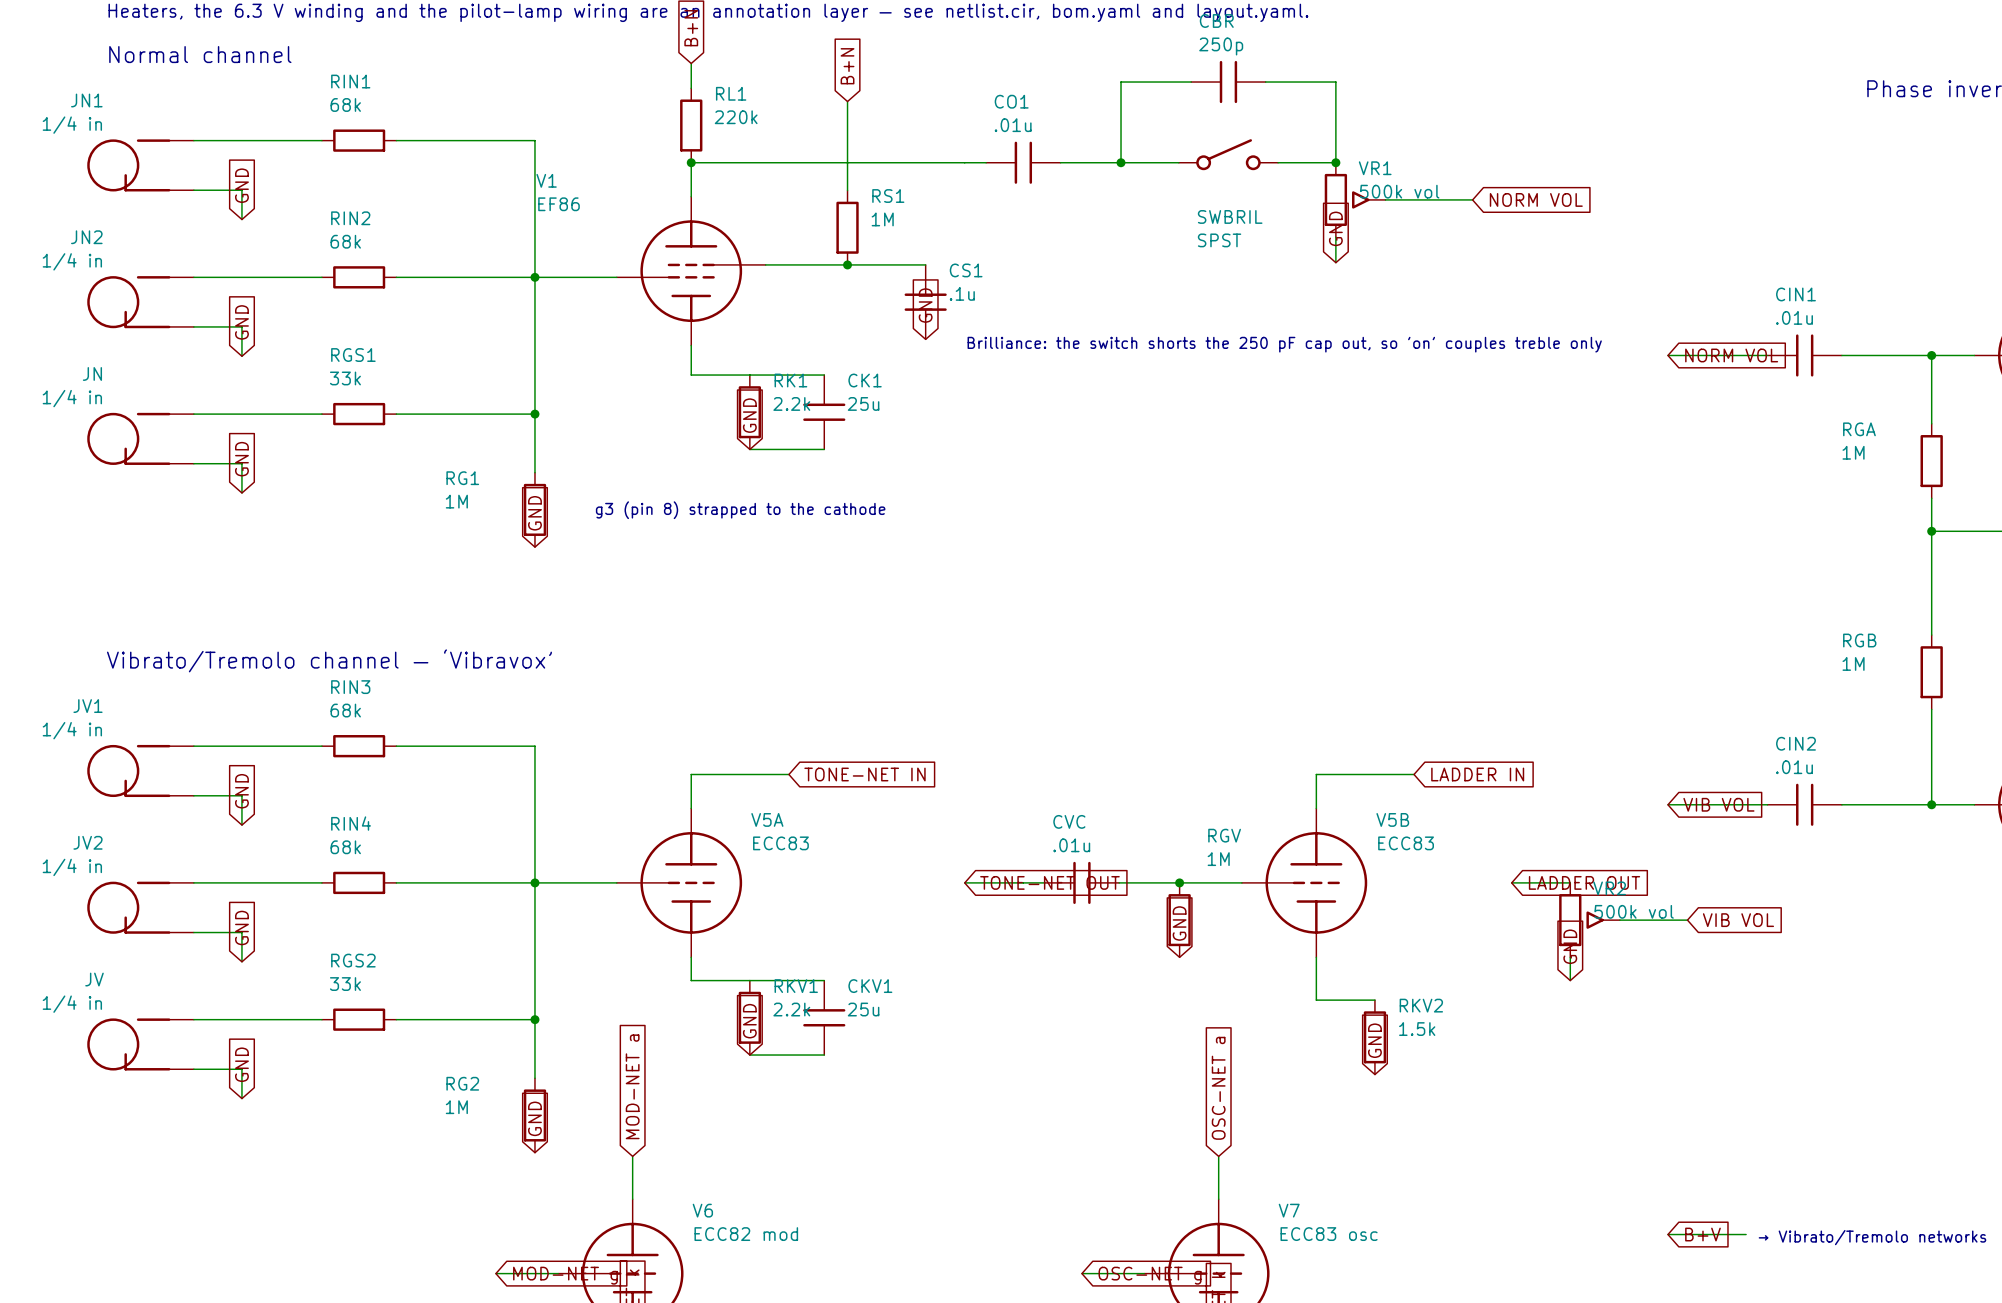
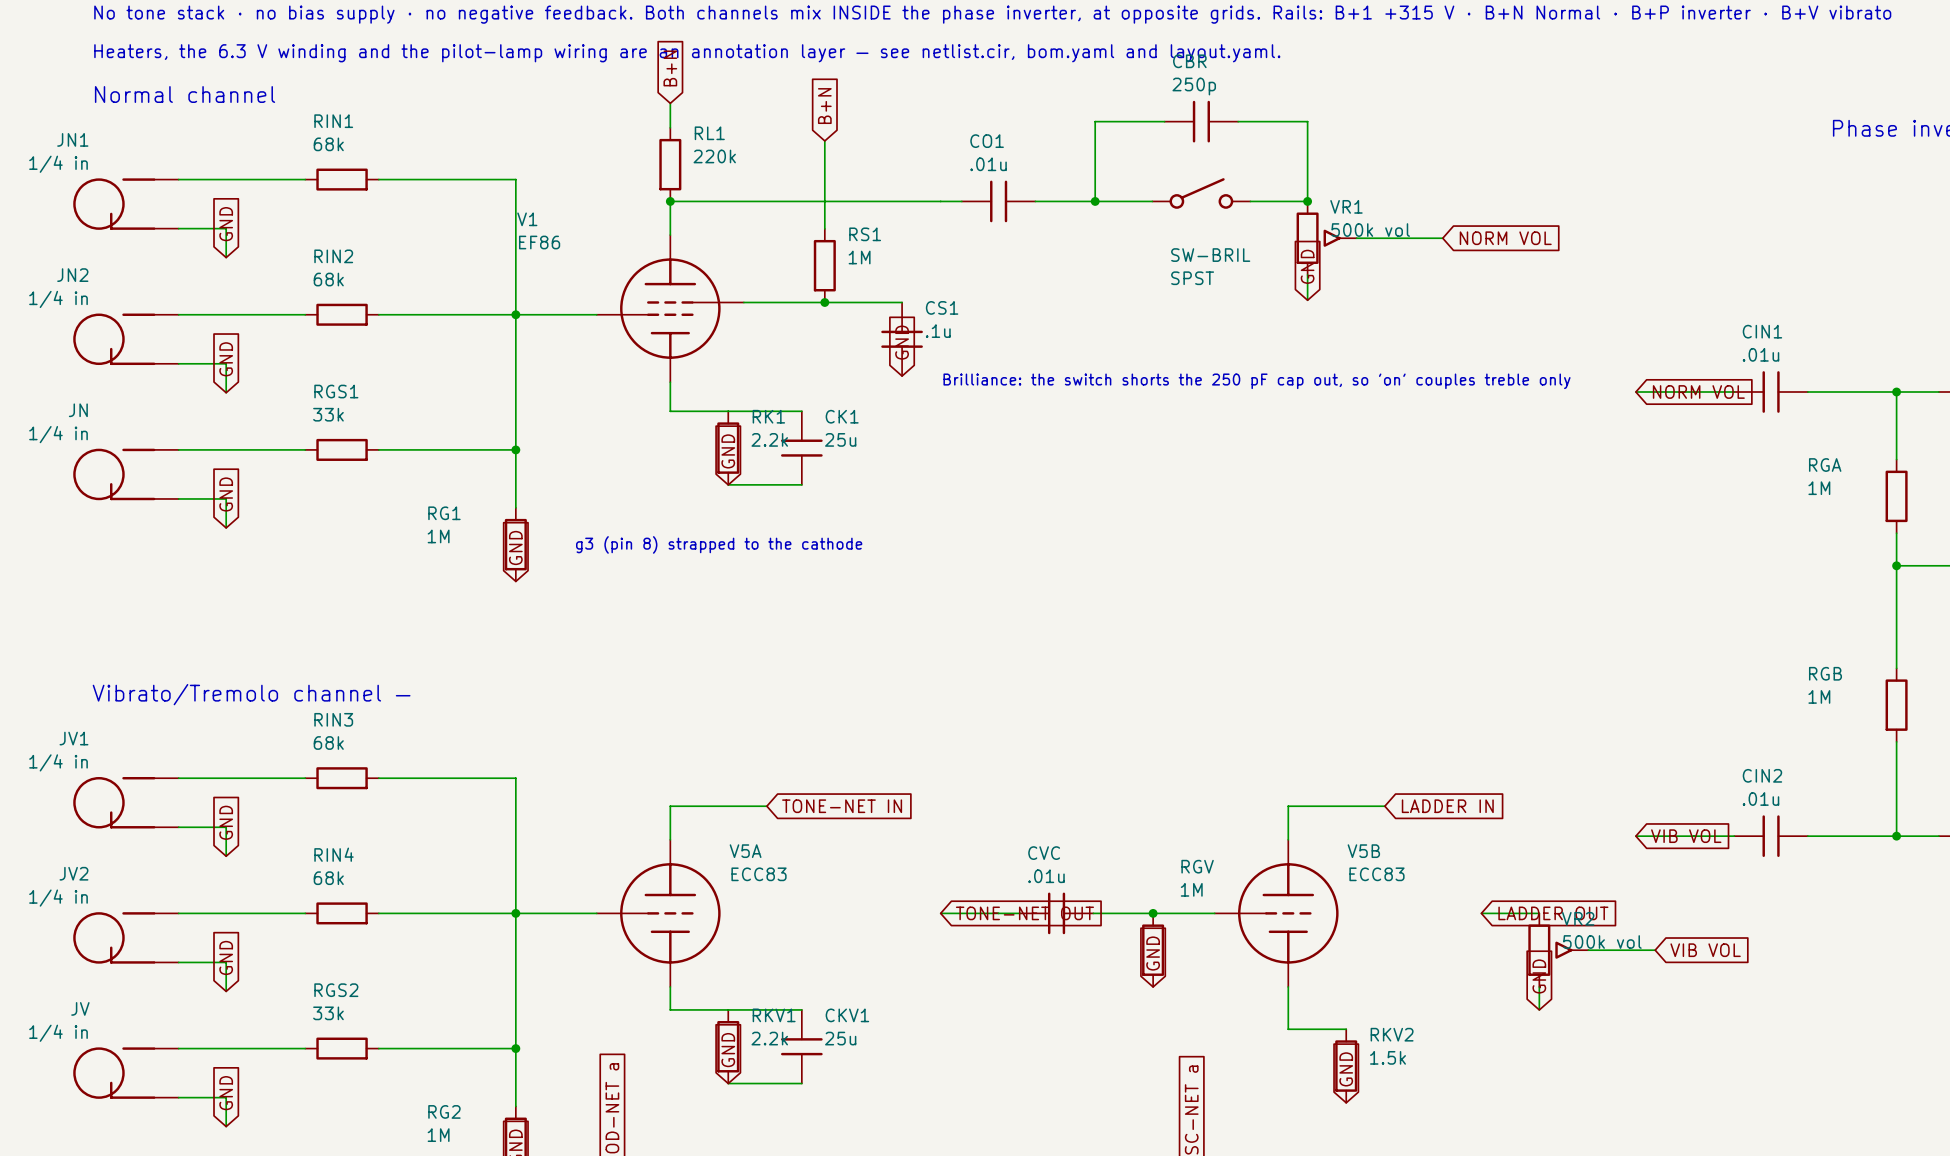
SWBRIL name: SWBRIL (1230, 216) -> SW-BRIL (1210, 255)
text: Vibrato/Tremolo channel — ‘Vibravox’ (329, 660) -> Vibrato/Tremolo channel — (251, 694)

